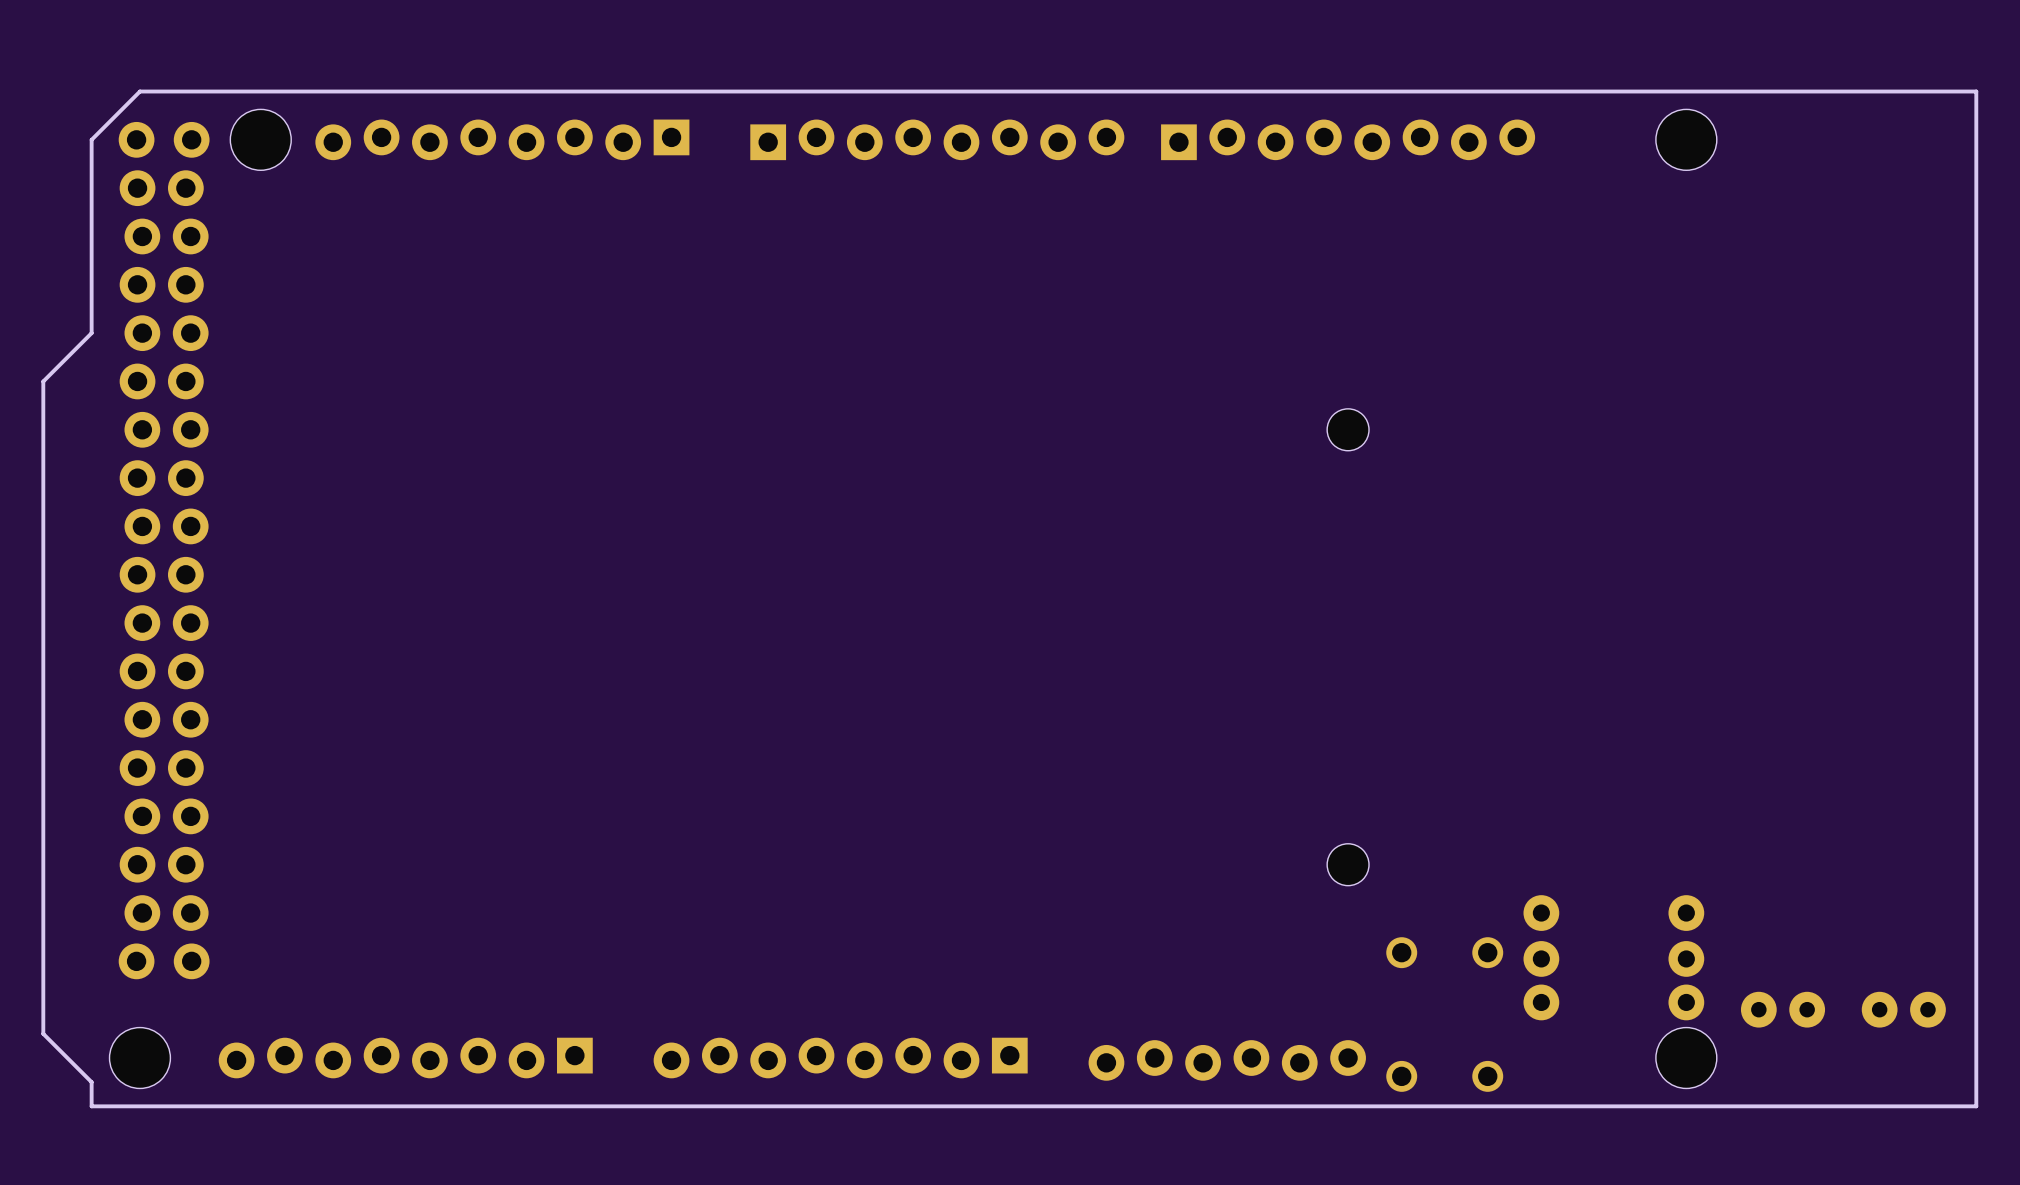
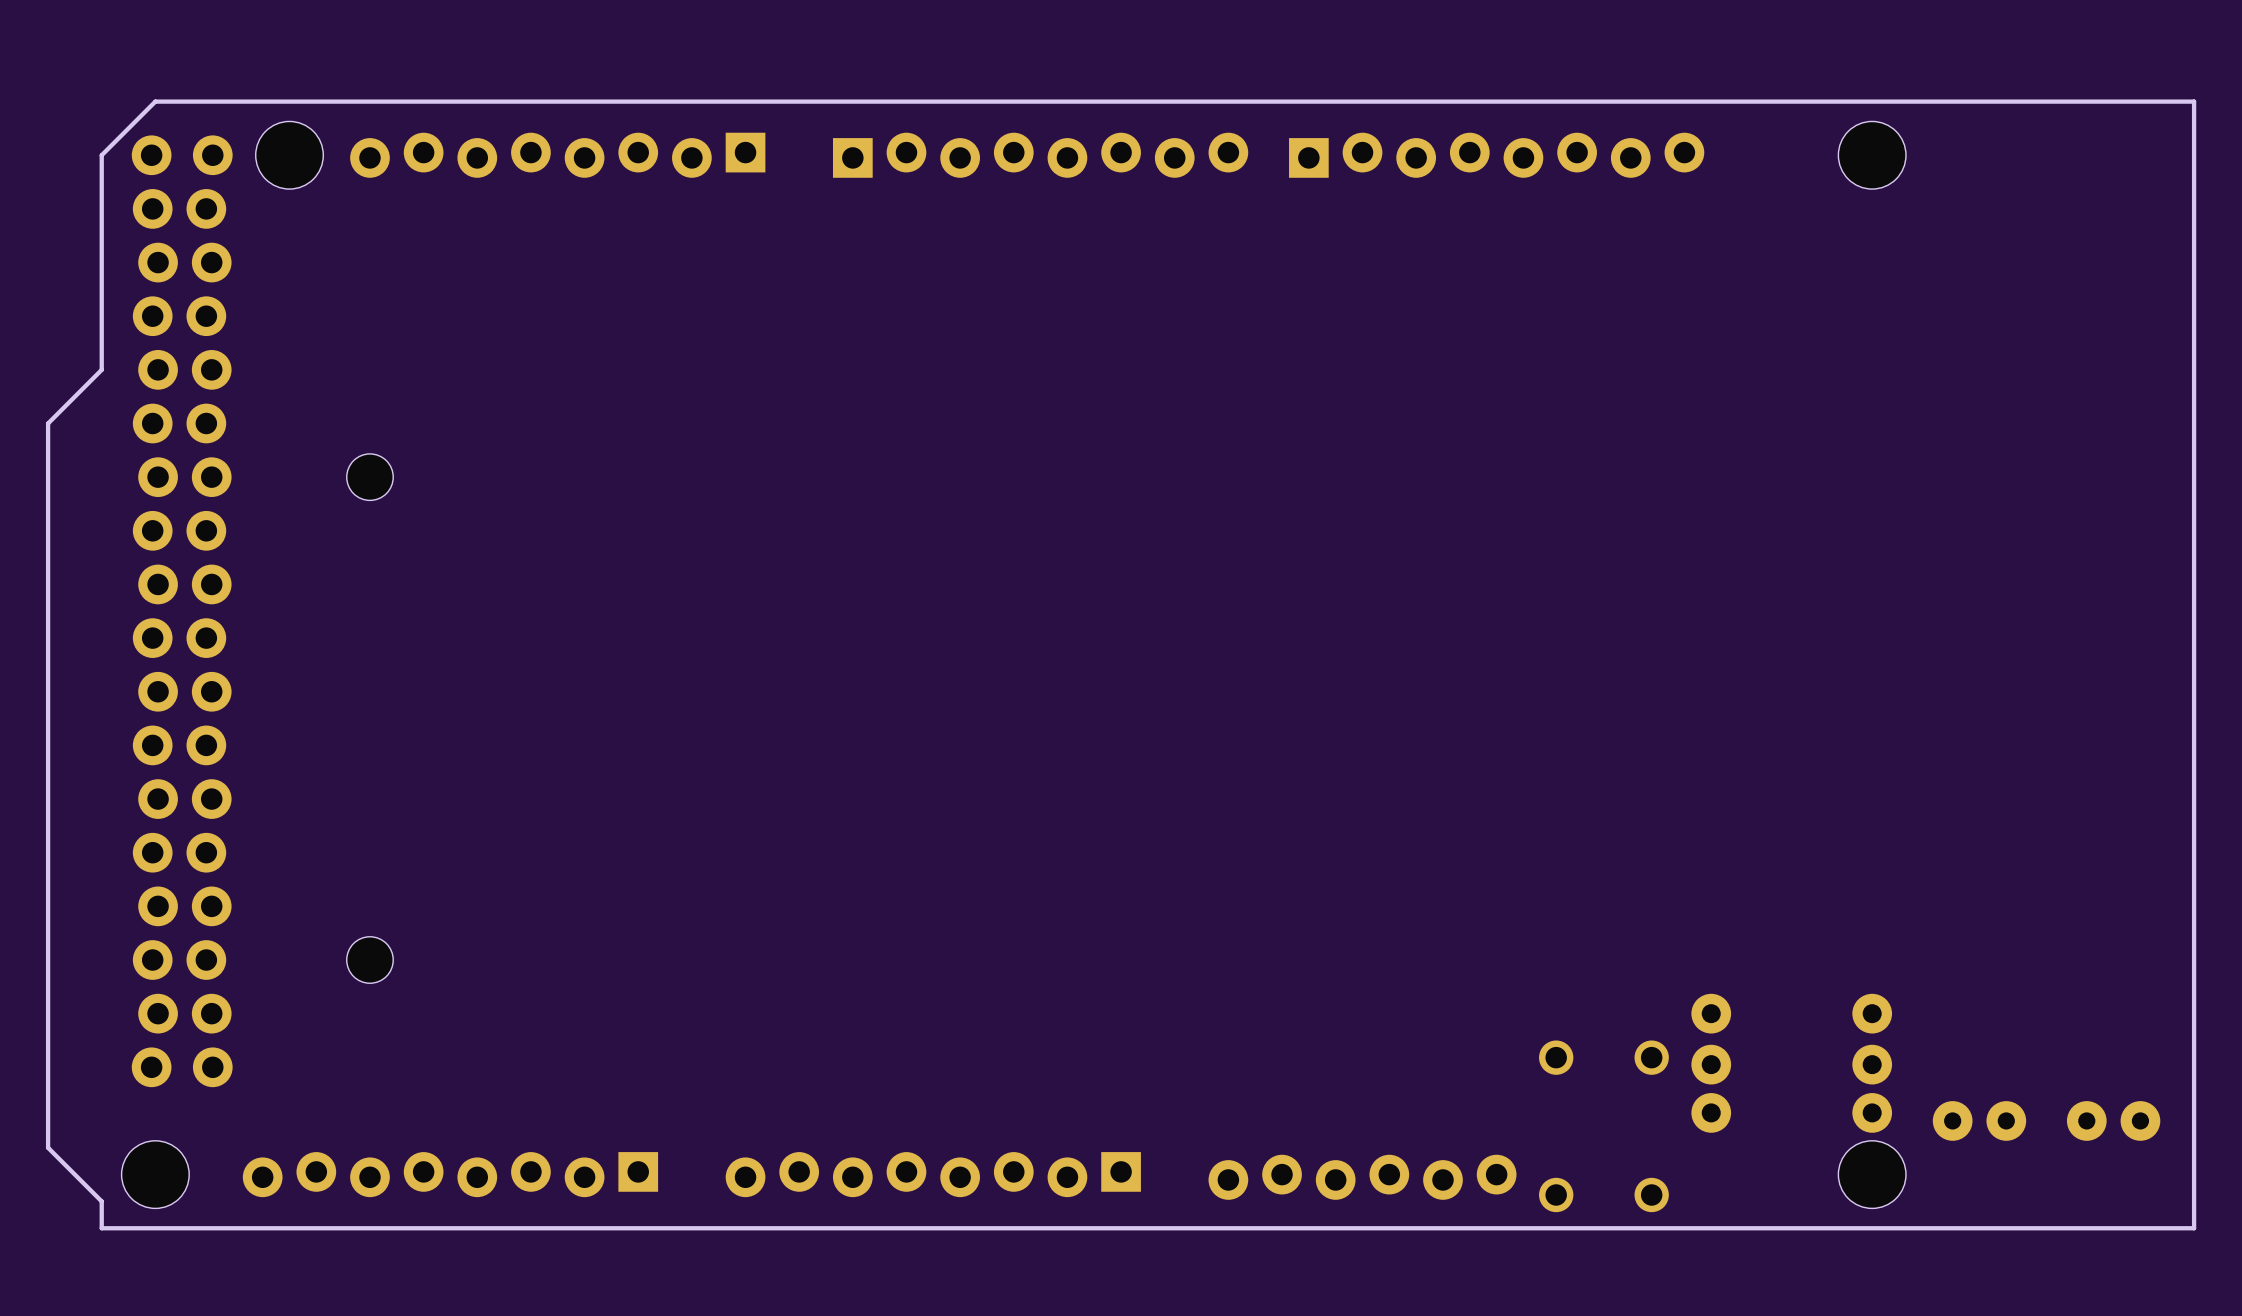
hole: none -> (369, 477)
hole: (1348, 429) -> none
hole: none -> (369, 960)
hole: (1348, 864) -> none

